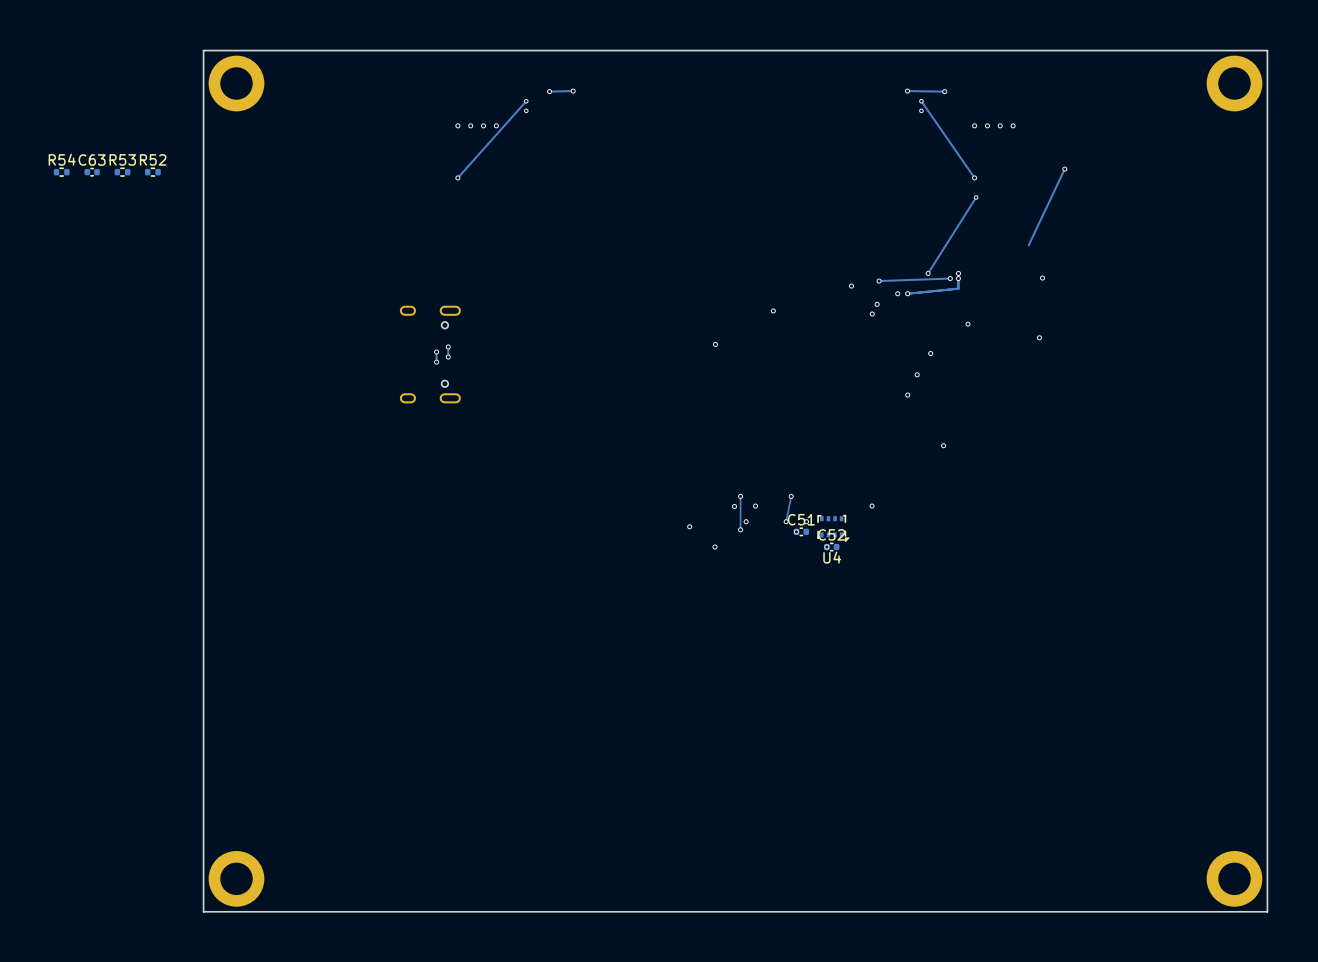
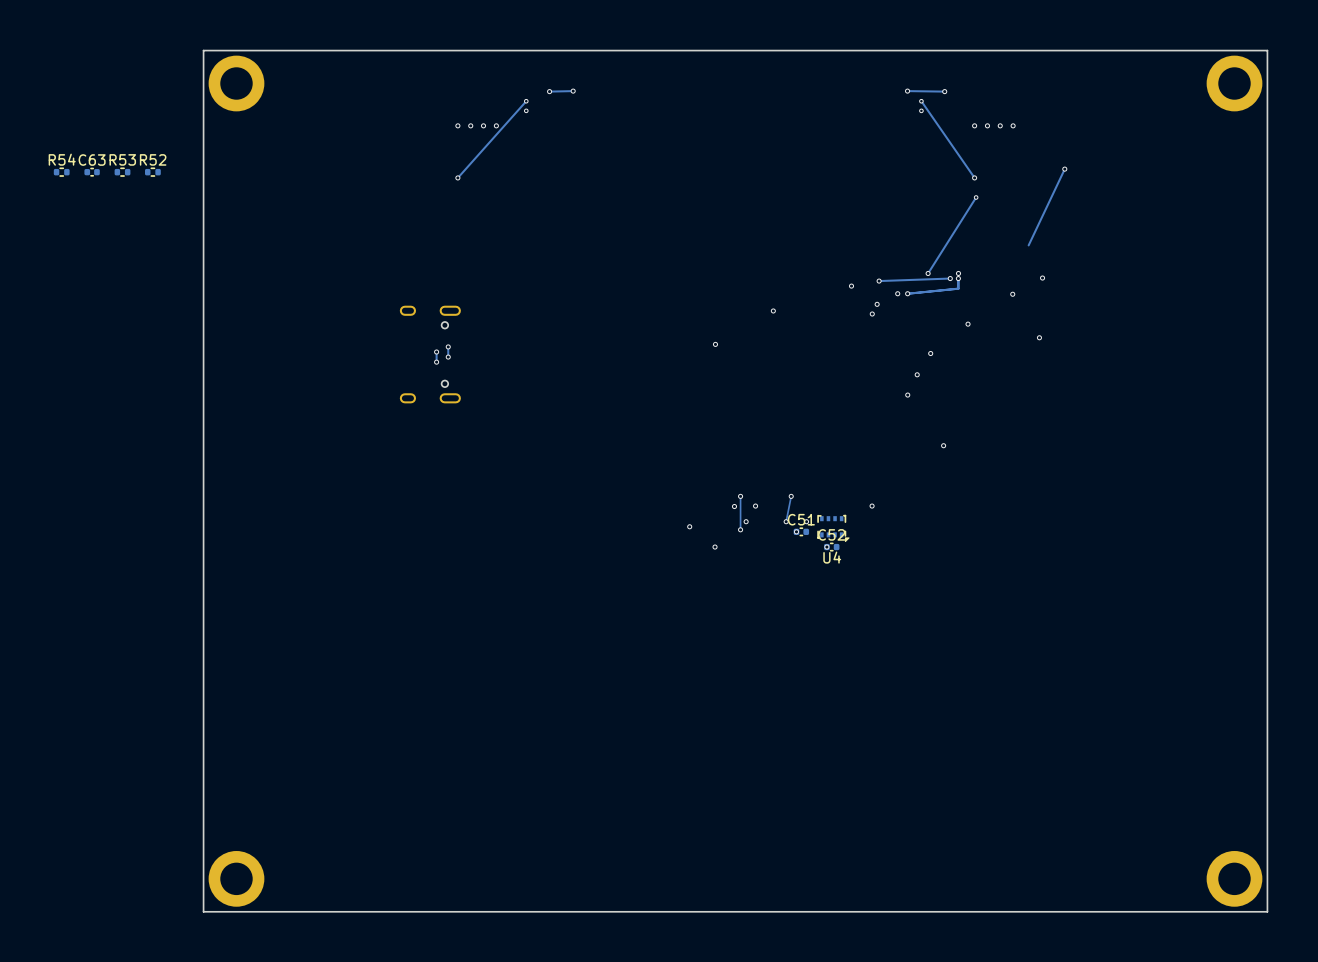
via: none -> (1012, 294)

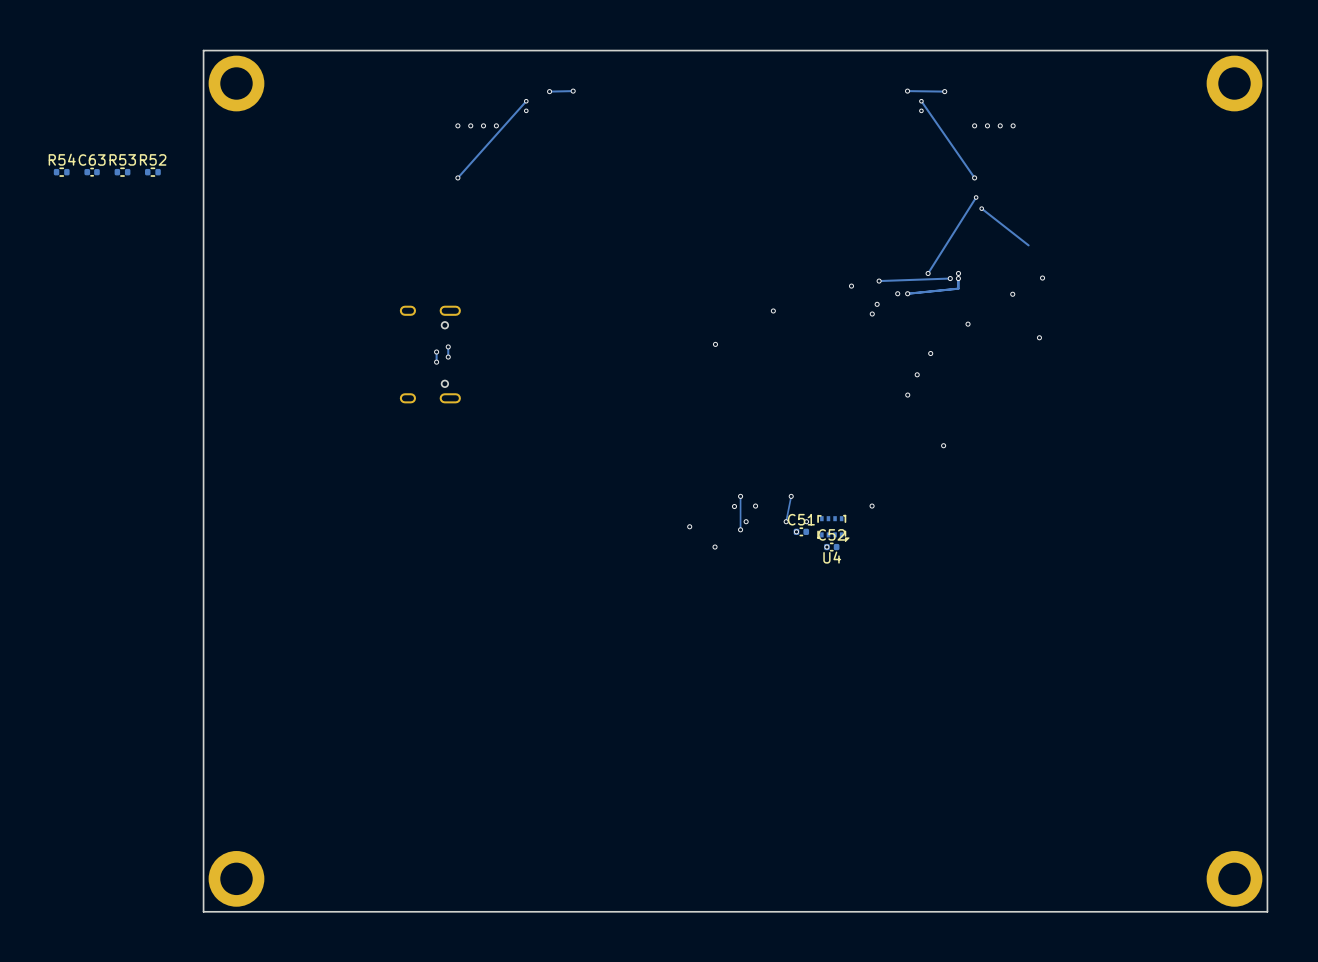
track: (1064, 169) (1028, 245) -> (981, 208) (1028, 245)
via: (1064, 169) -> none
via: none -> (981, 208)

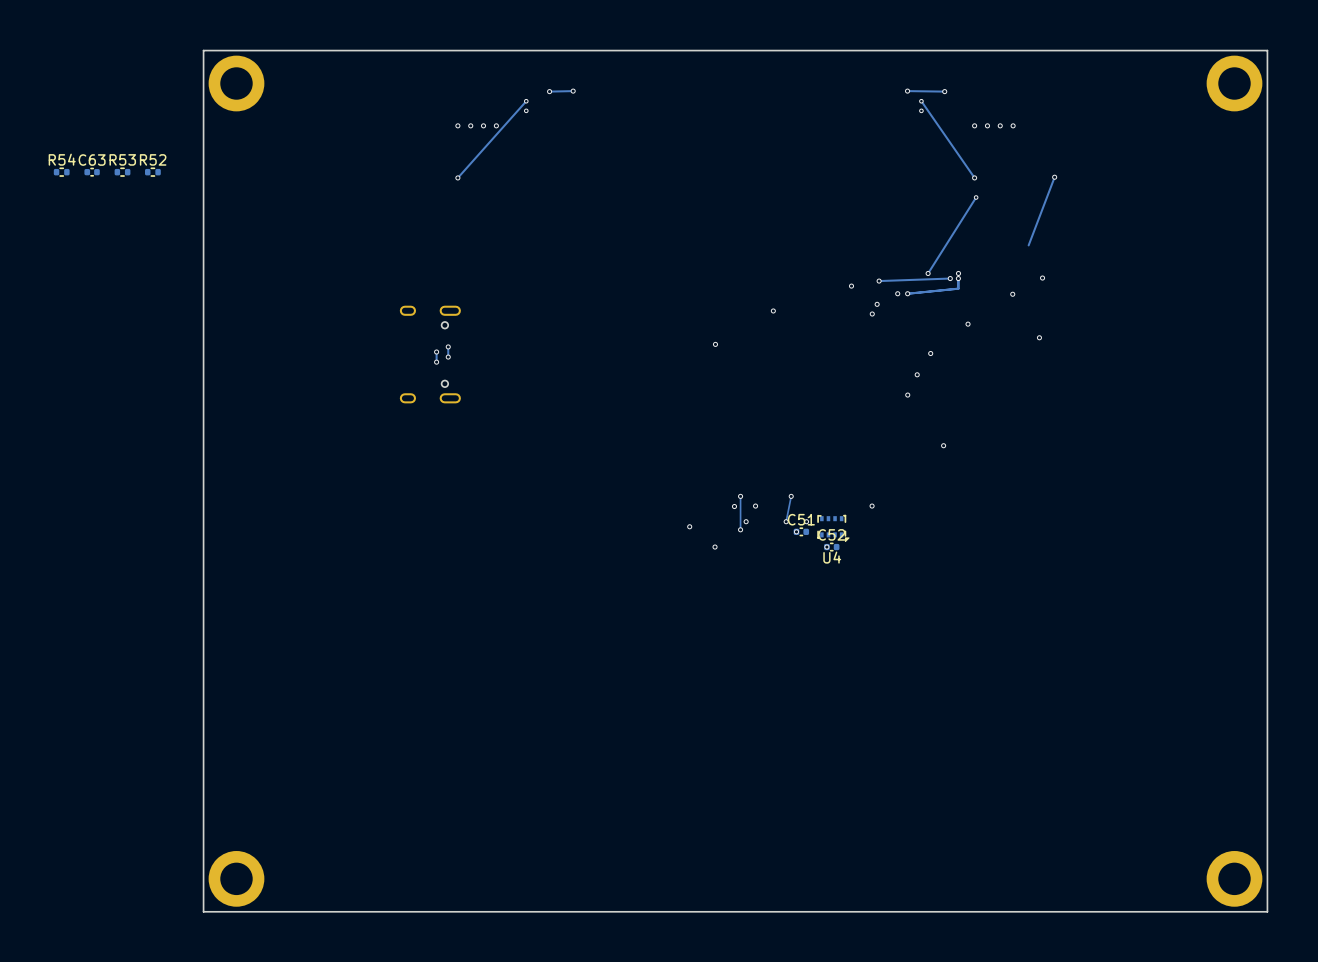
via: none -> (1054, 177)
track: (981, 208) (1028, 245) -> (1054, 177) (1028, 245)
via: (981, 208) -> none

